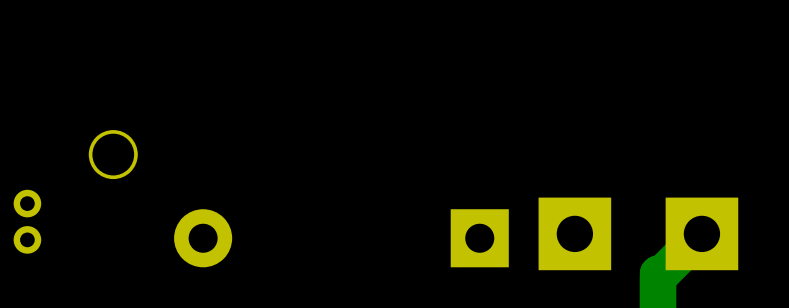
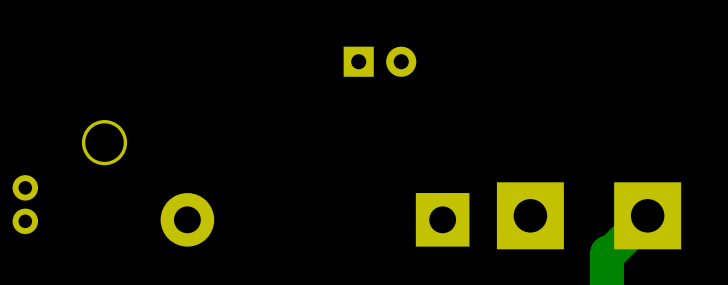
part: none -> (379, 61)

